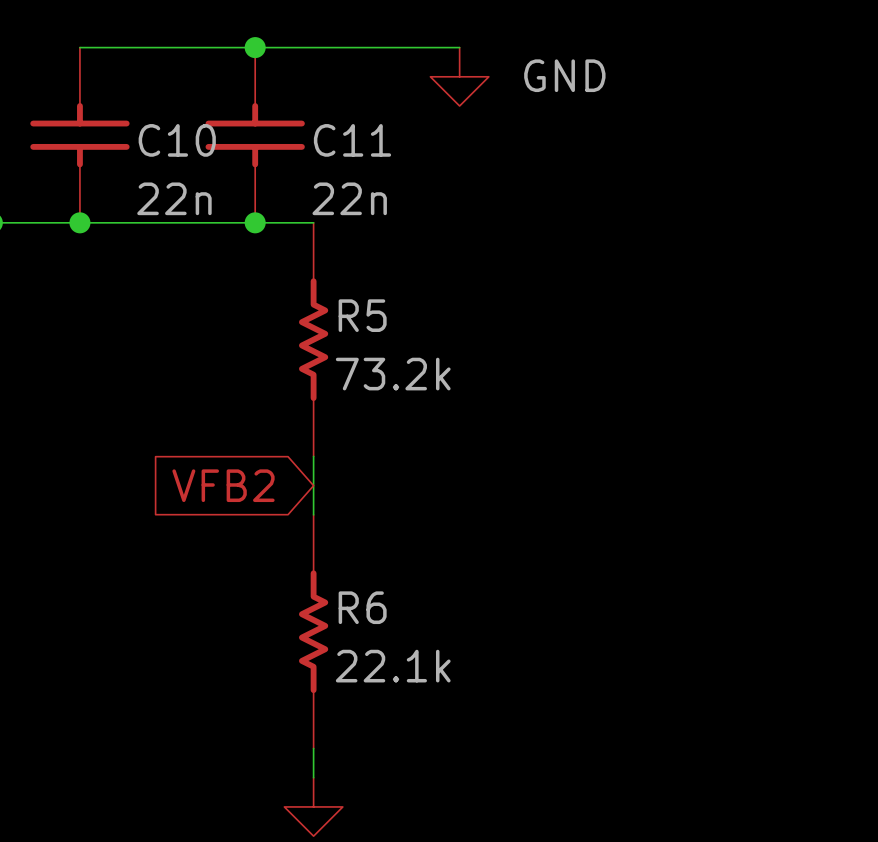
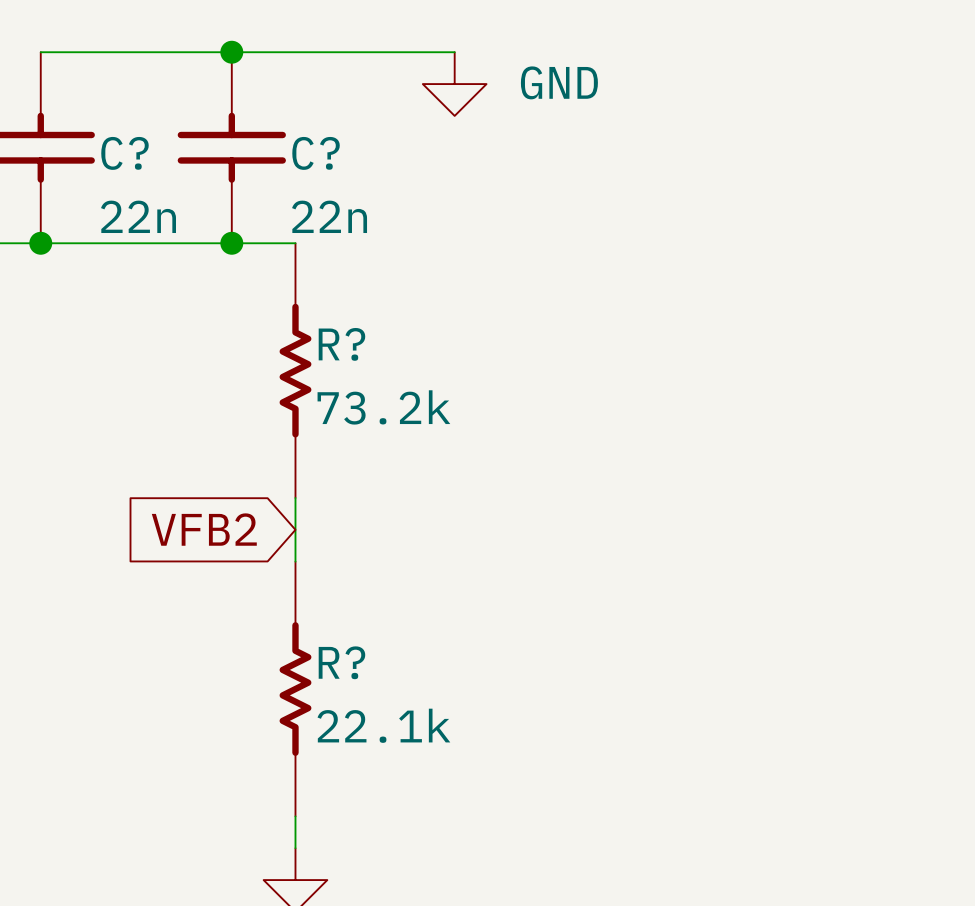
C10 name: C10 (177, 140) -> C? (124, 153)
C11 name: C11 (352, 140) -> C? (316, 153)
R5 name: R5 (362, 315) -> R? (341, 344)
R6 name: R6 (362, 607) -> R? (341, 662)

